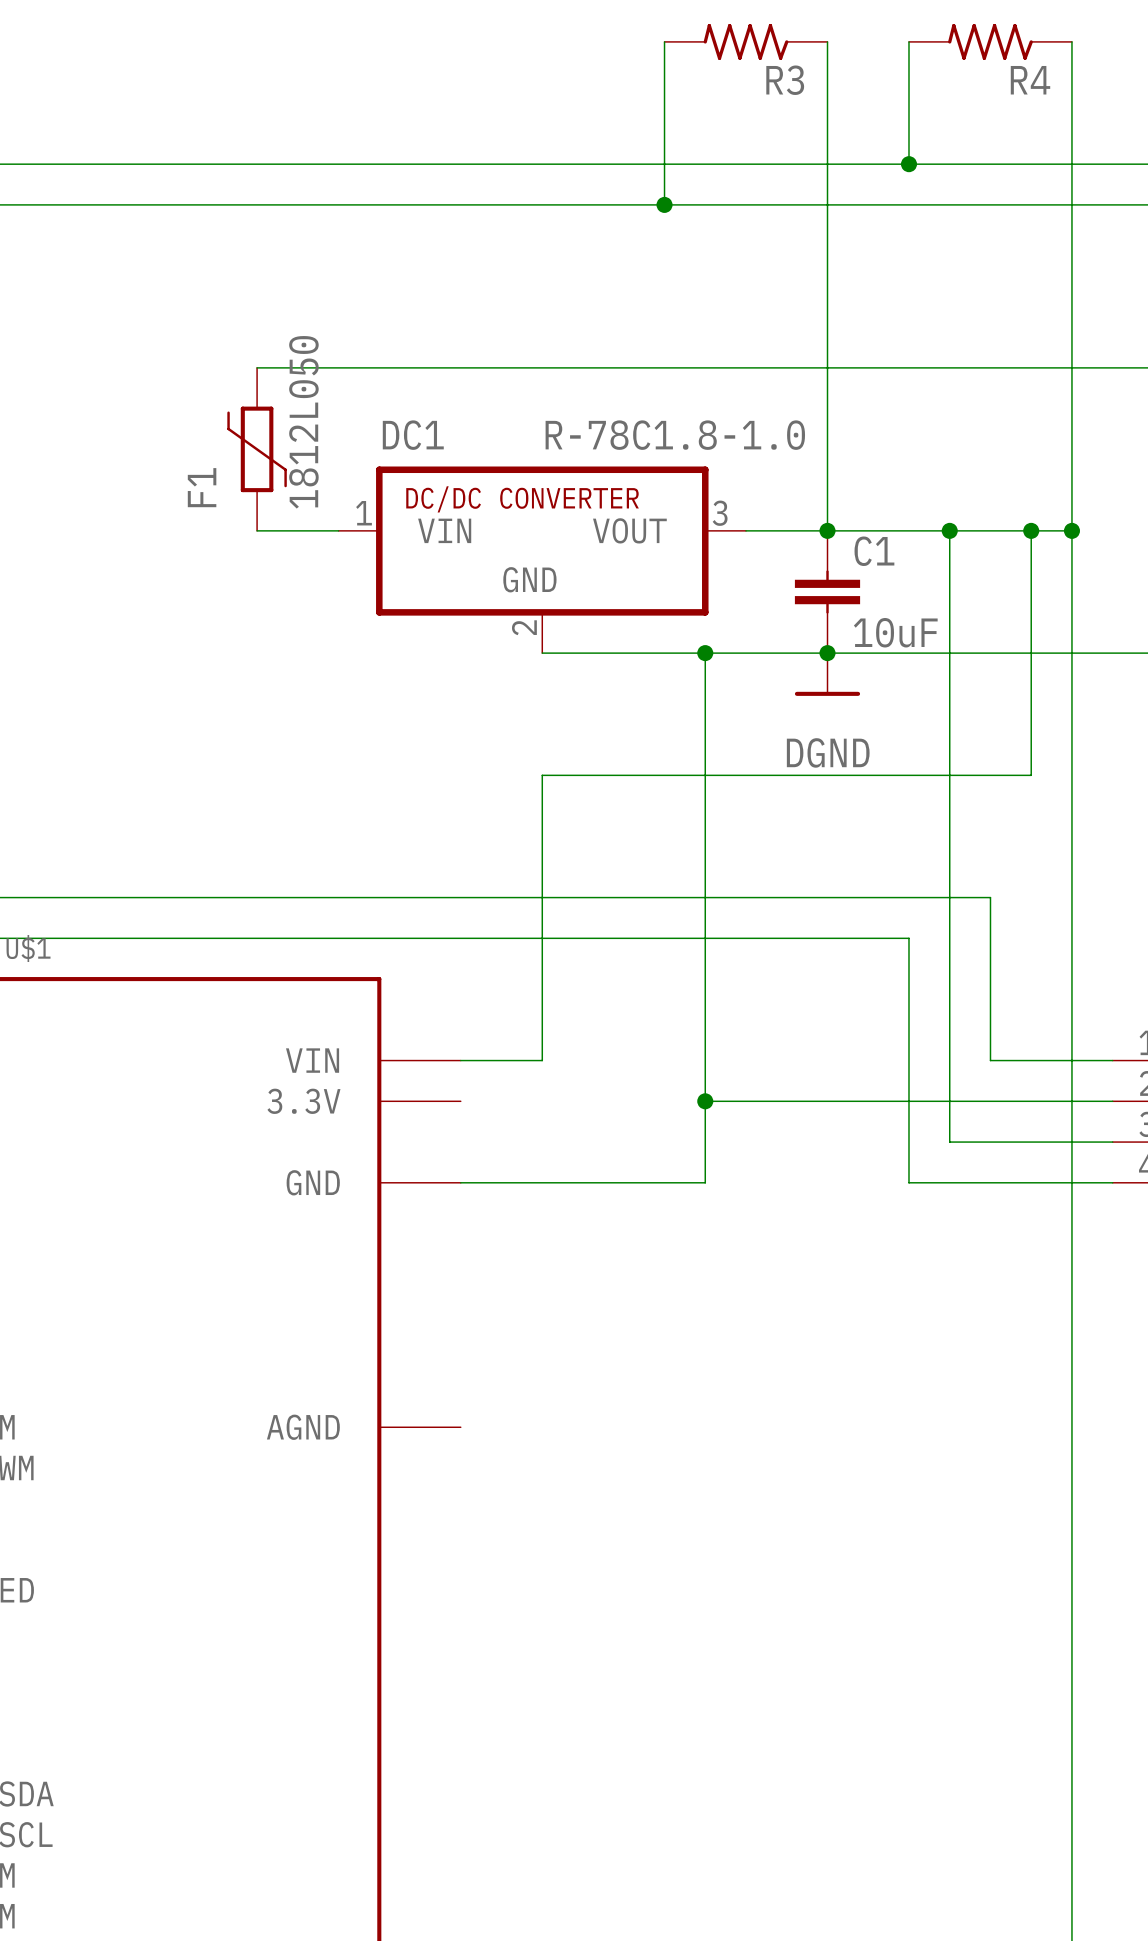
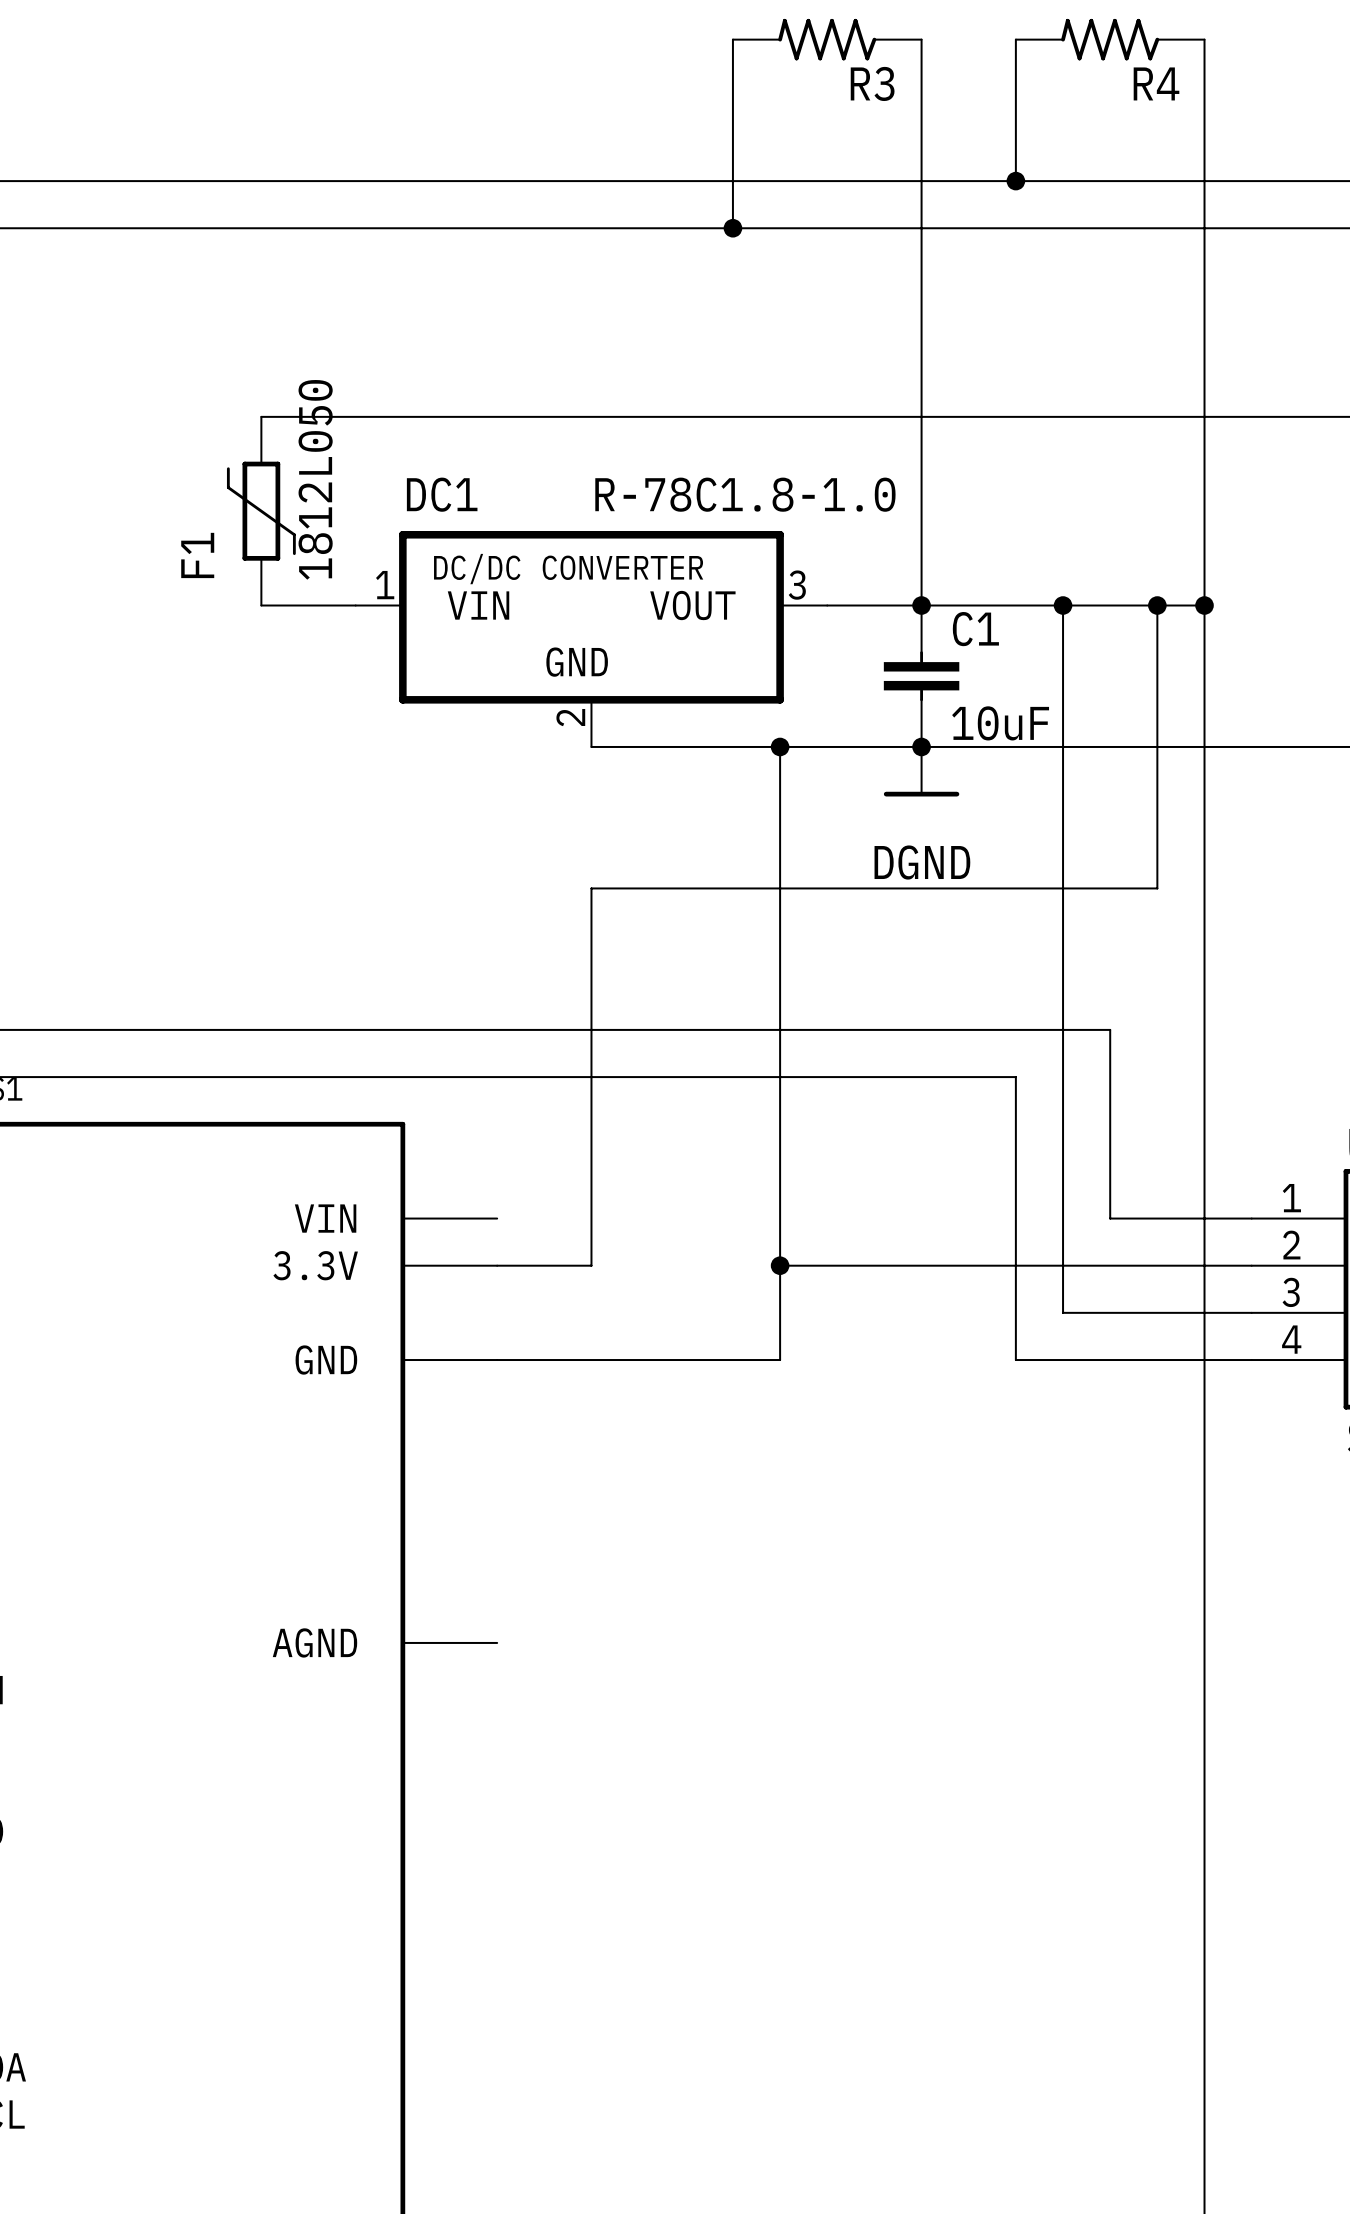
wire: (460, 1060) (542, 1060) -> (497, 1265) (591, 1265) (591, 1218)

